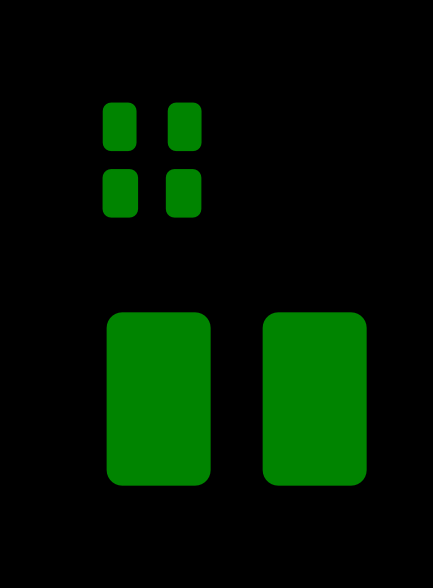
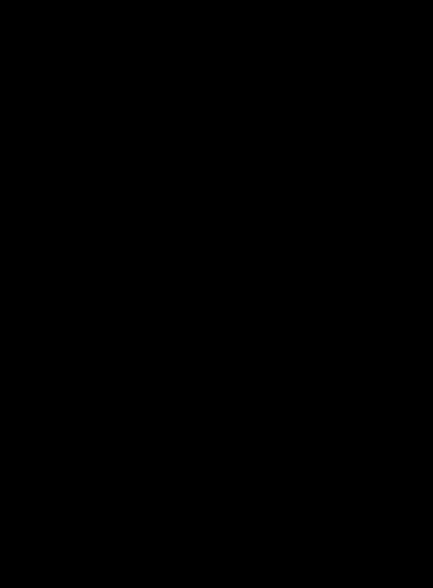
part: (152, 126) -> none
part: (151, 193) -> none
part: (236, 398) -> none

